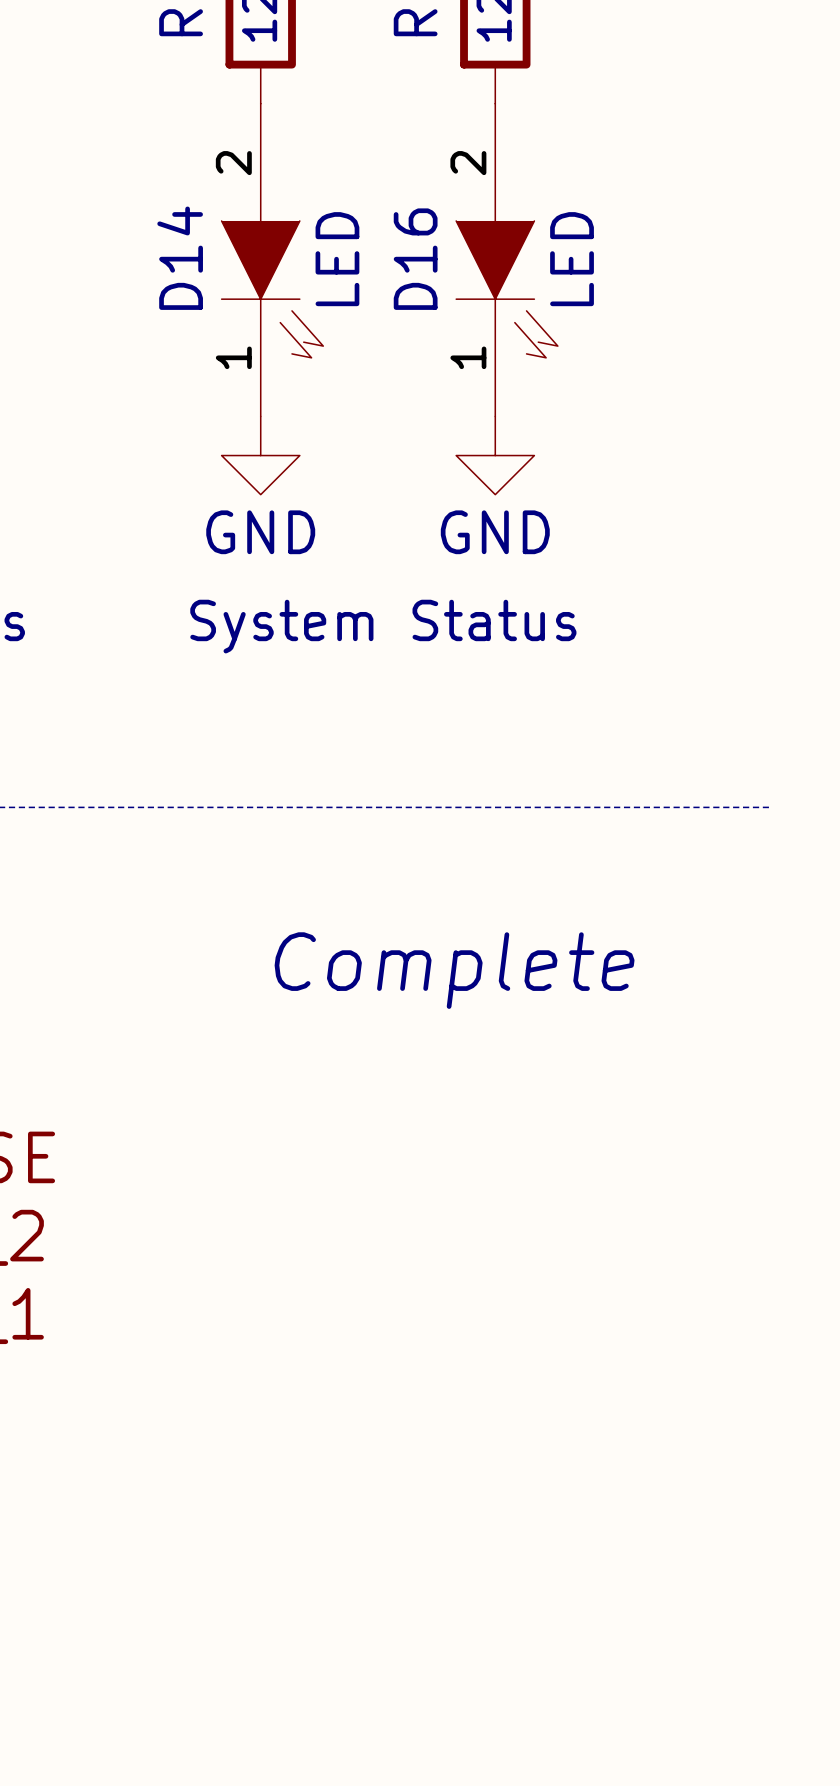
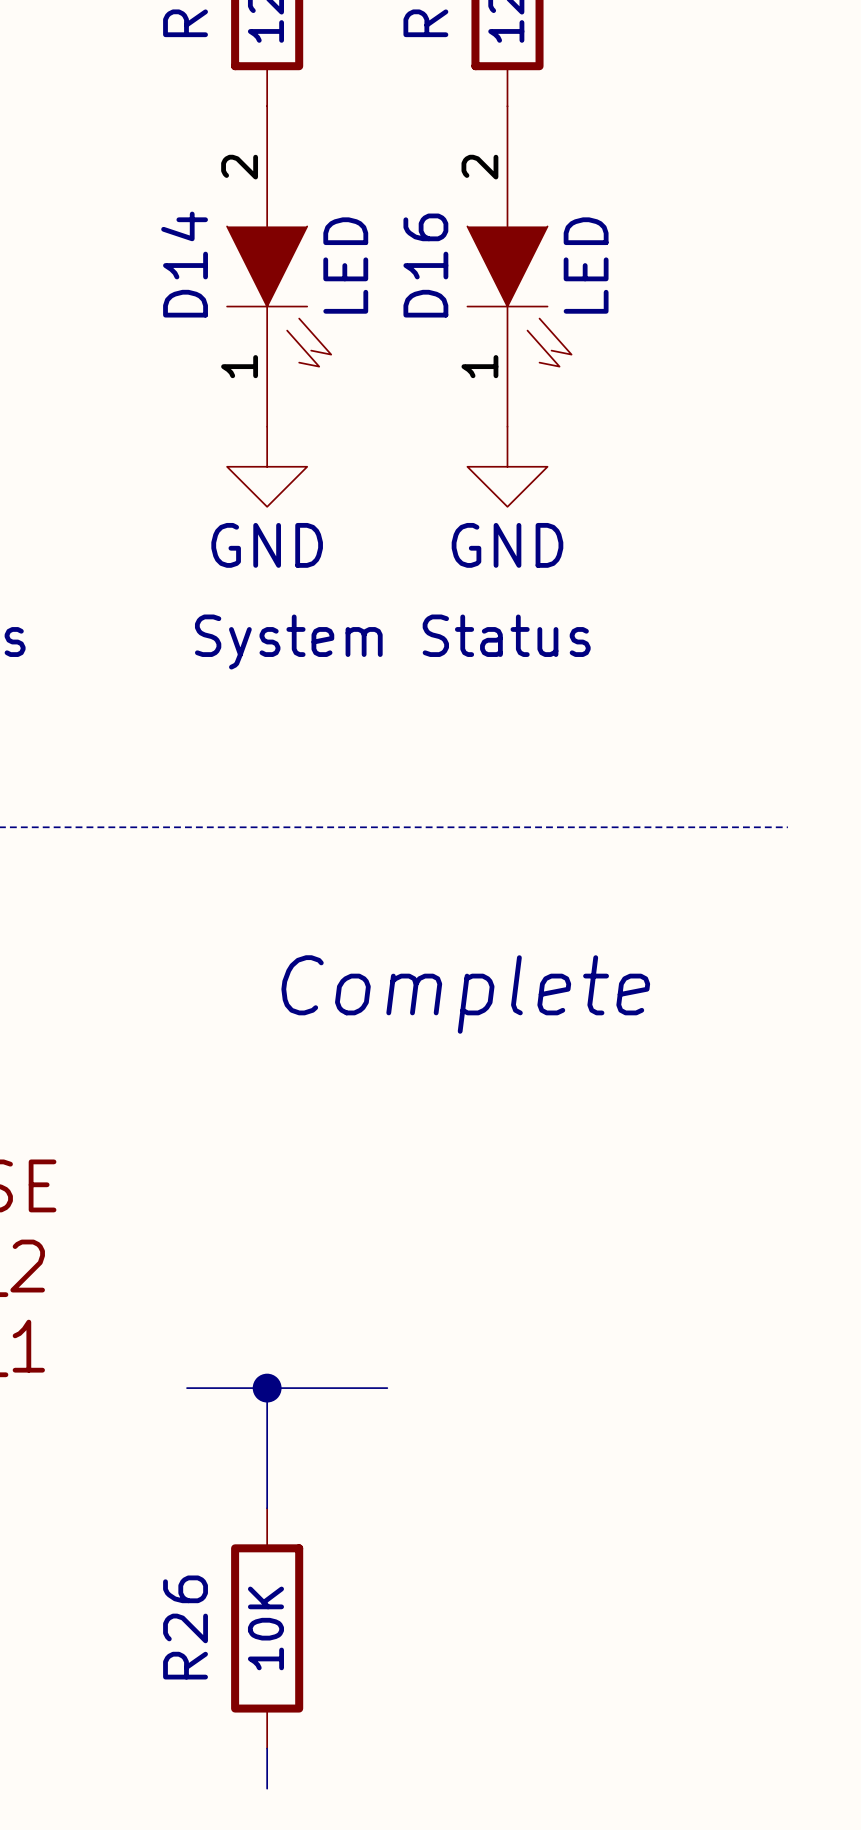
wire: none -> (187, 1388) (387, 1388)
wire: none -> (267, 1388) (267, 1508)
junction: none -> (267, 1388)
R26: none -> 10K (267, 1628)
wire: none -> (267, 1748) (267, 1788)

